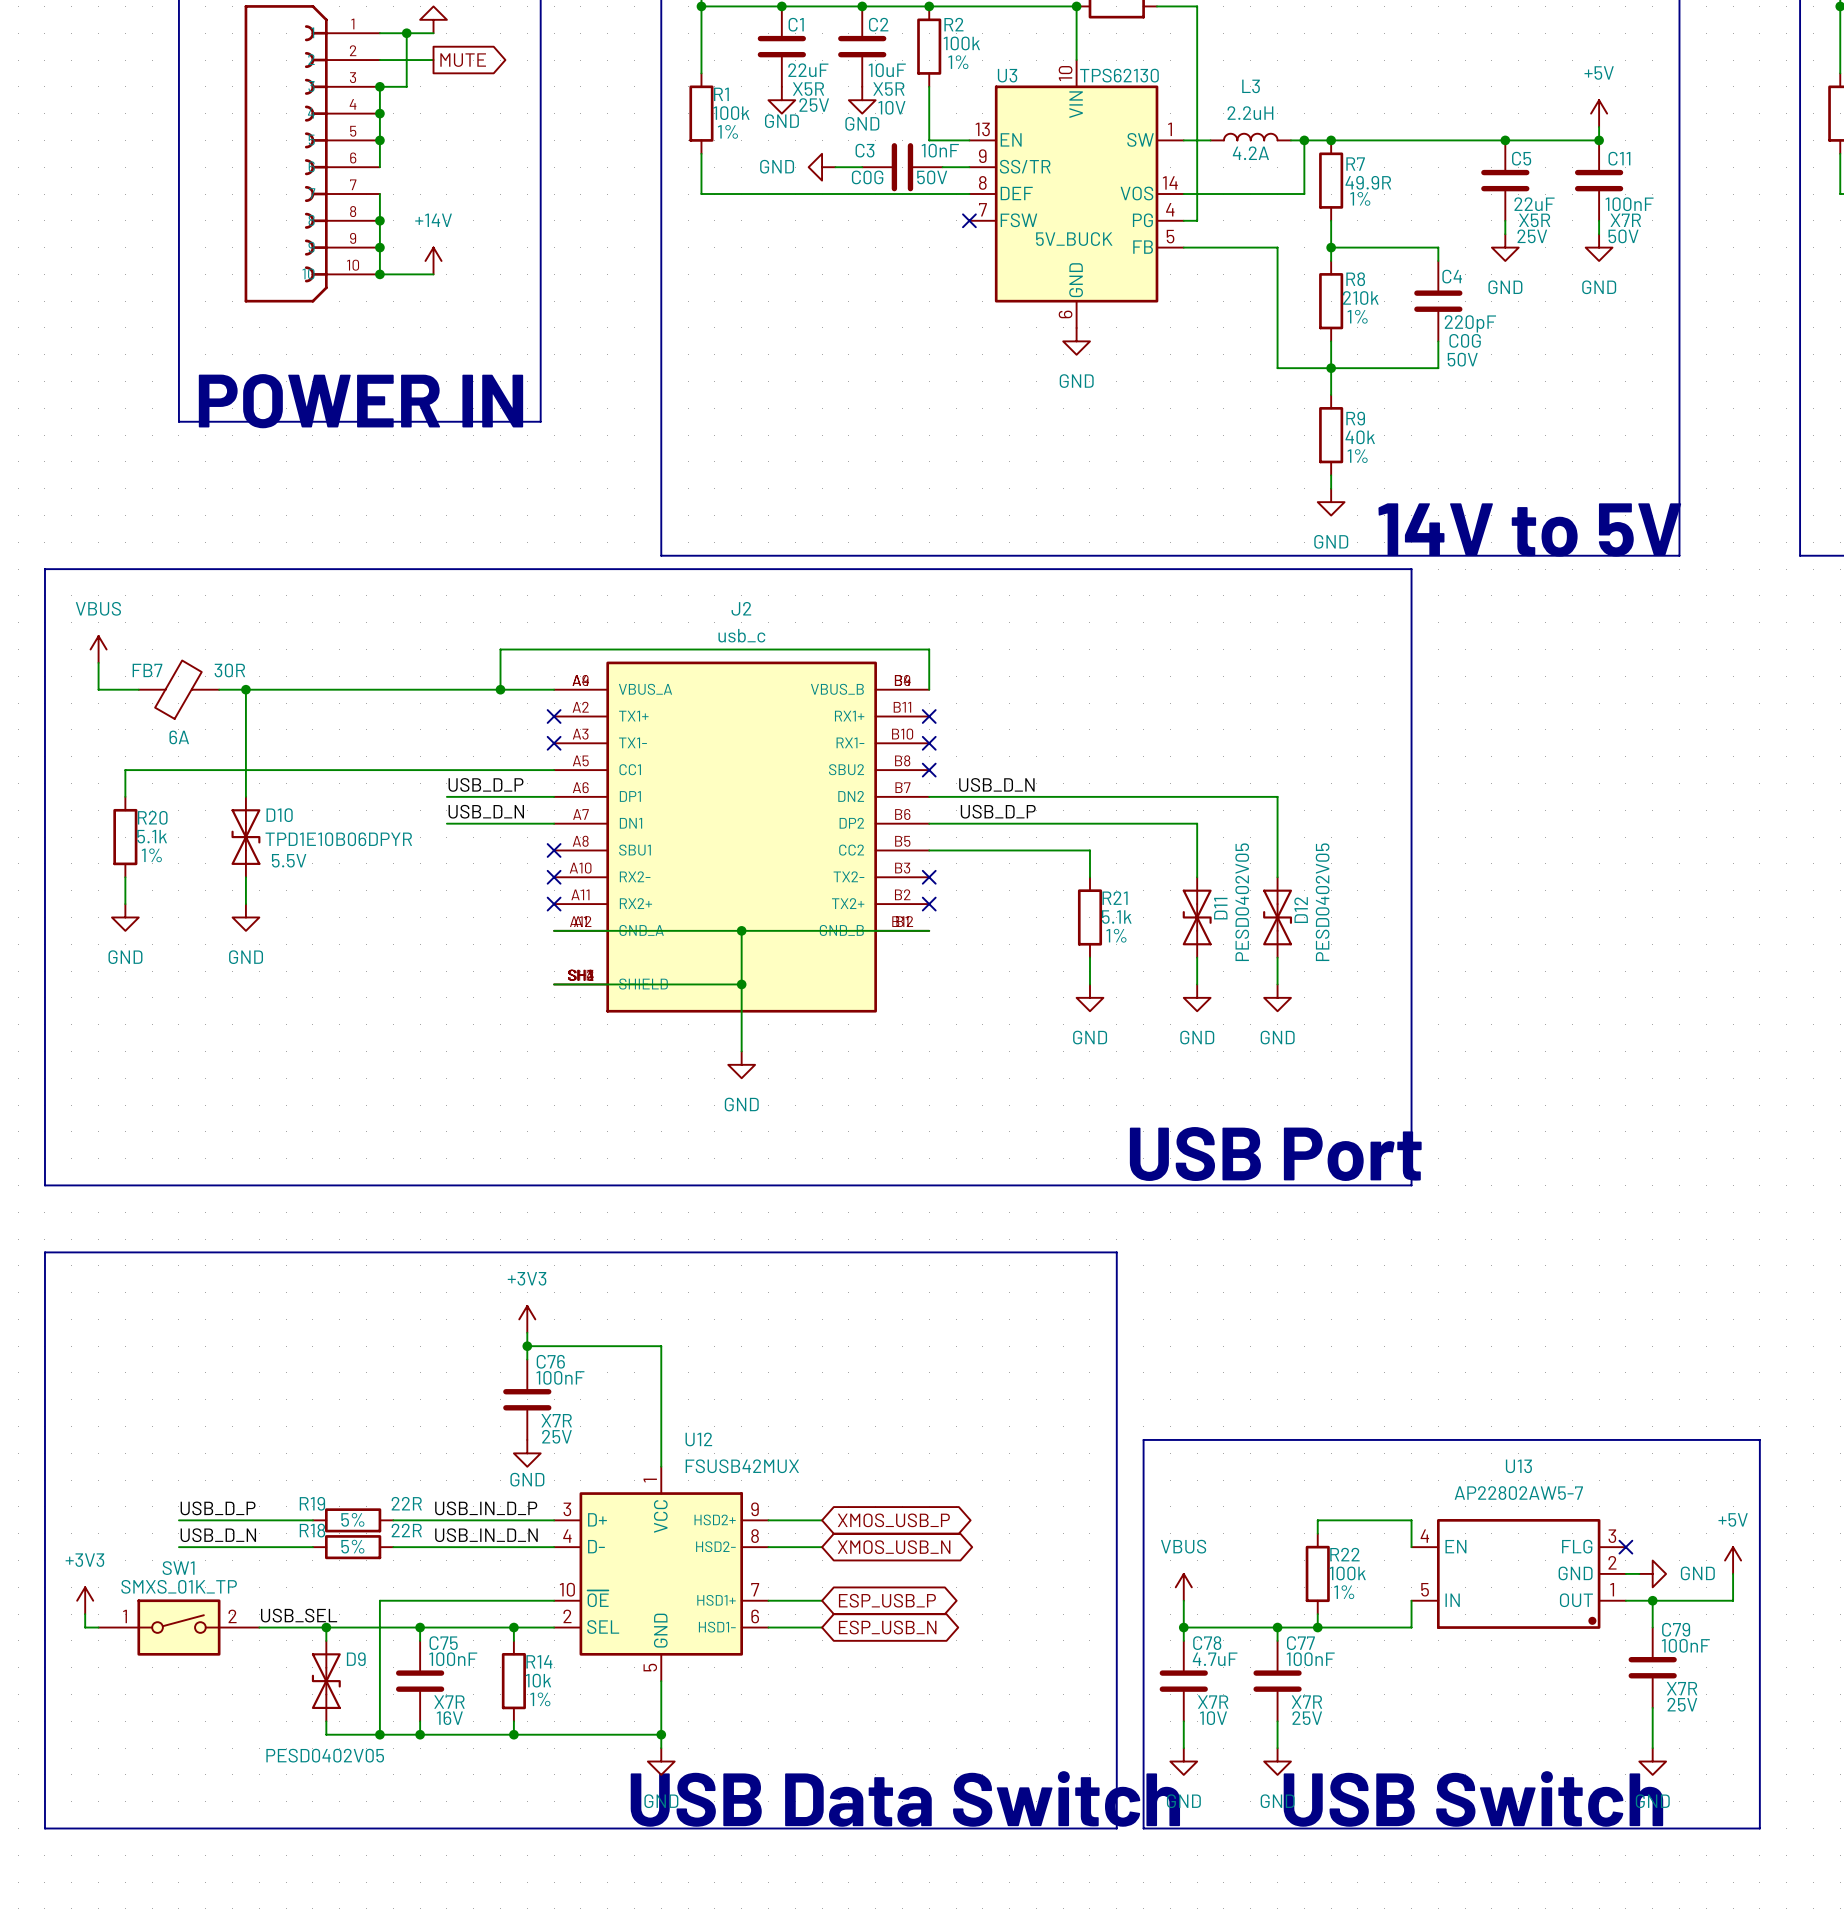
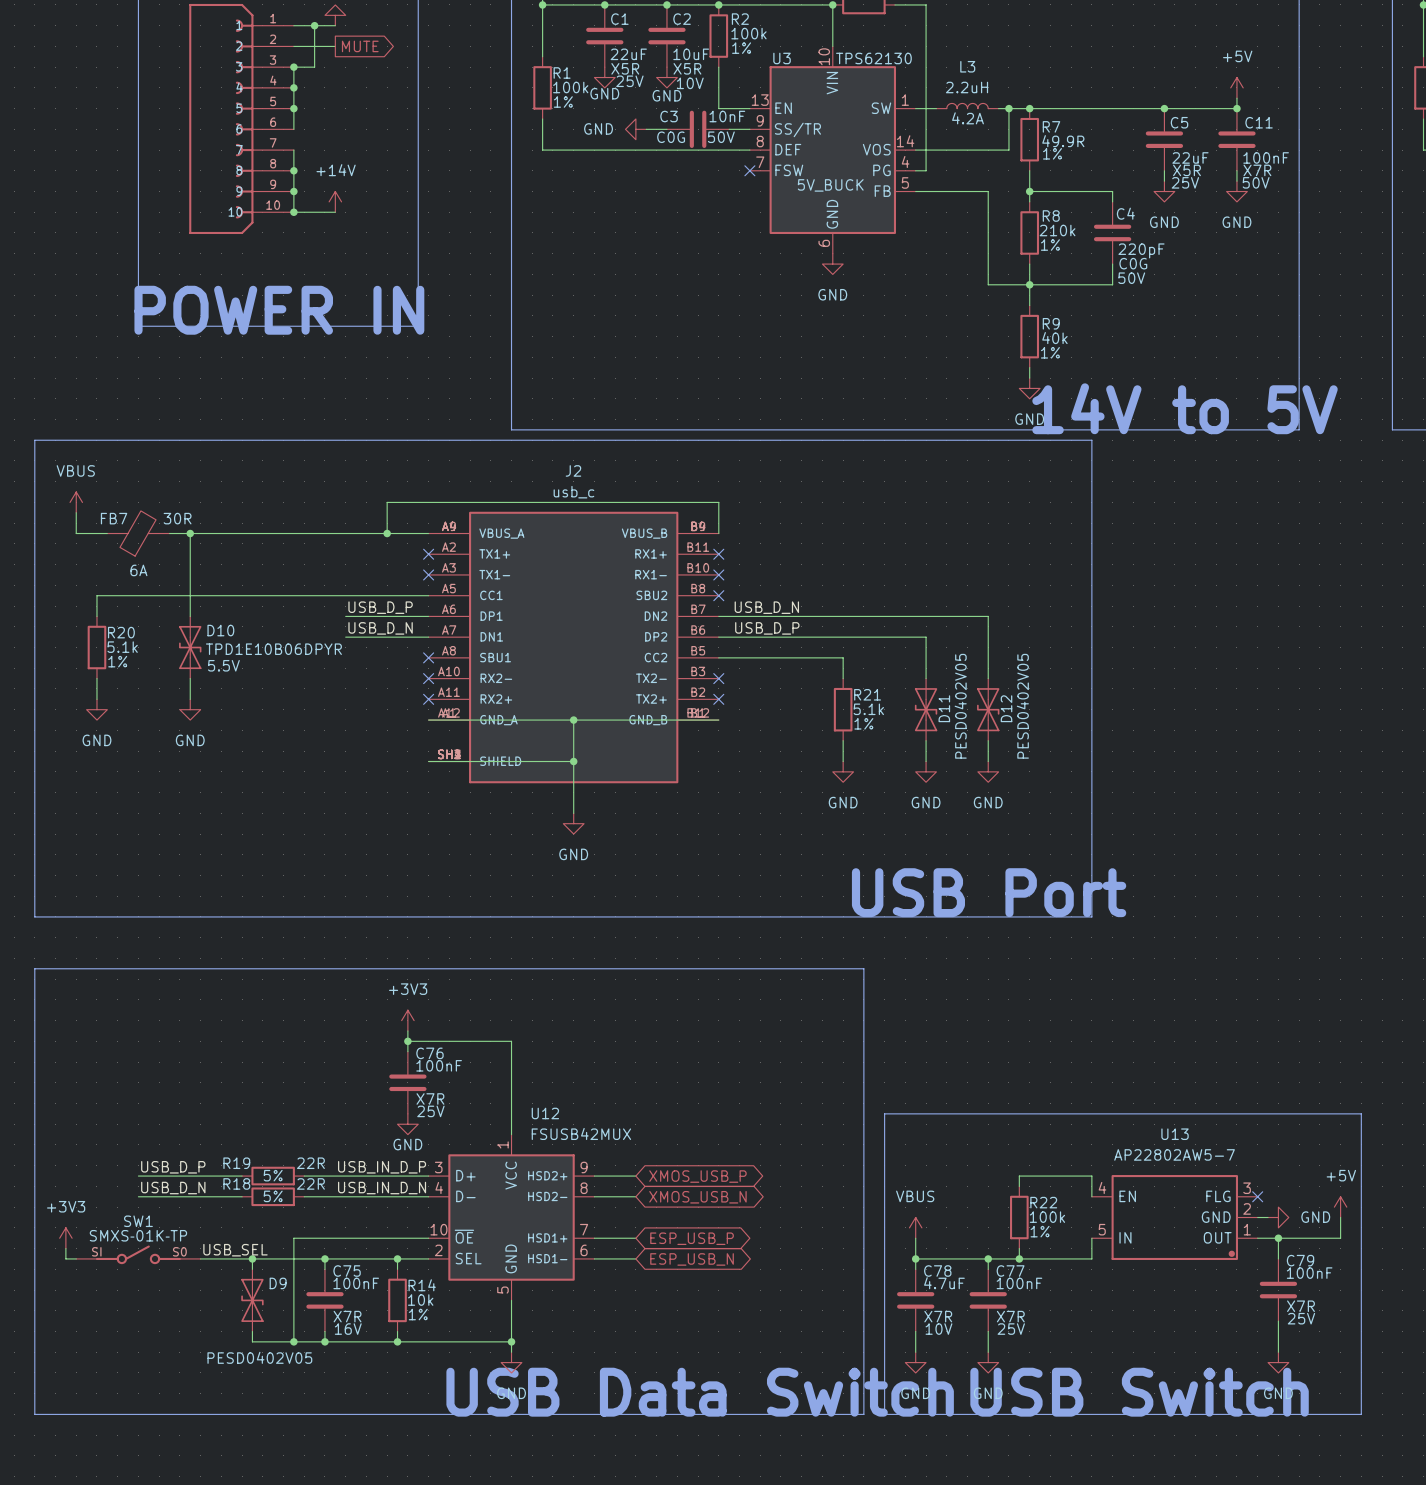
SW1 value: SMXS_01K_TP (179, 1586) -> SMXS‑01K‑TP (138, 1235)
SW1 symbol: [98, 1599, 260, 1656] -> [76, 1245, 201, 1265]

